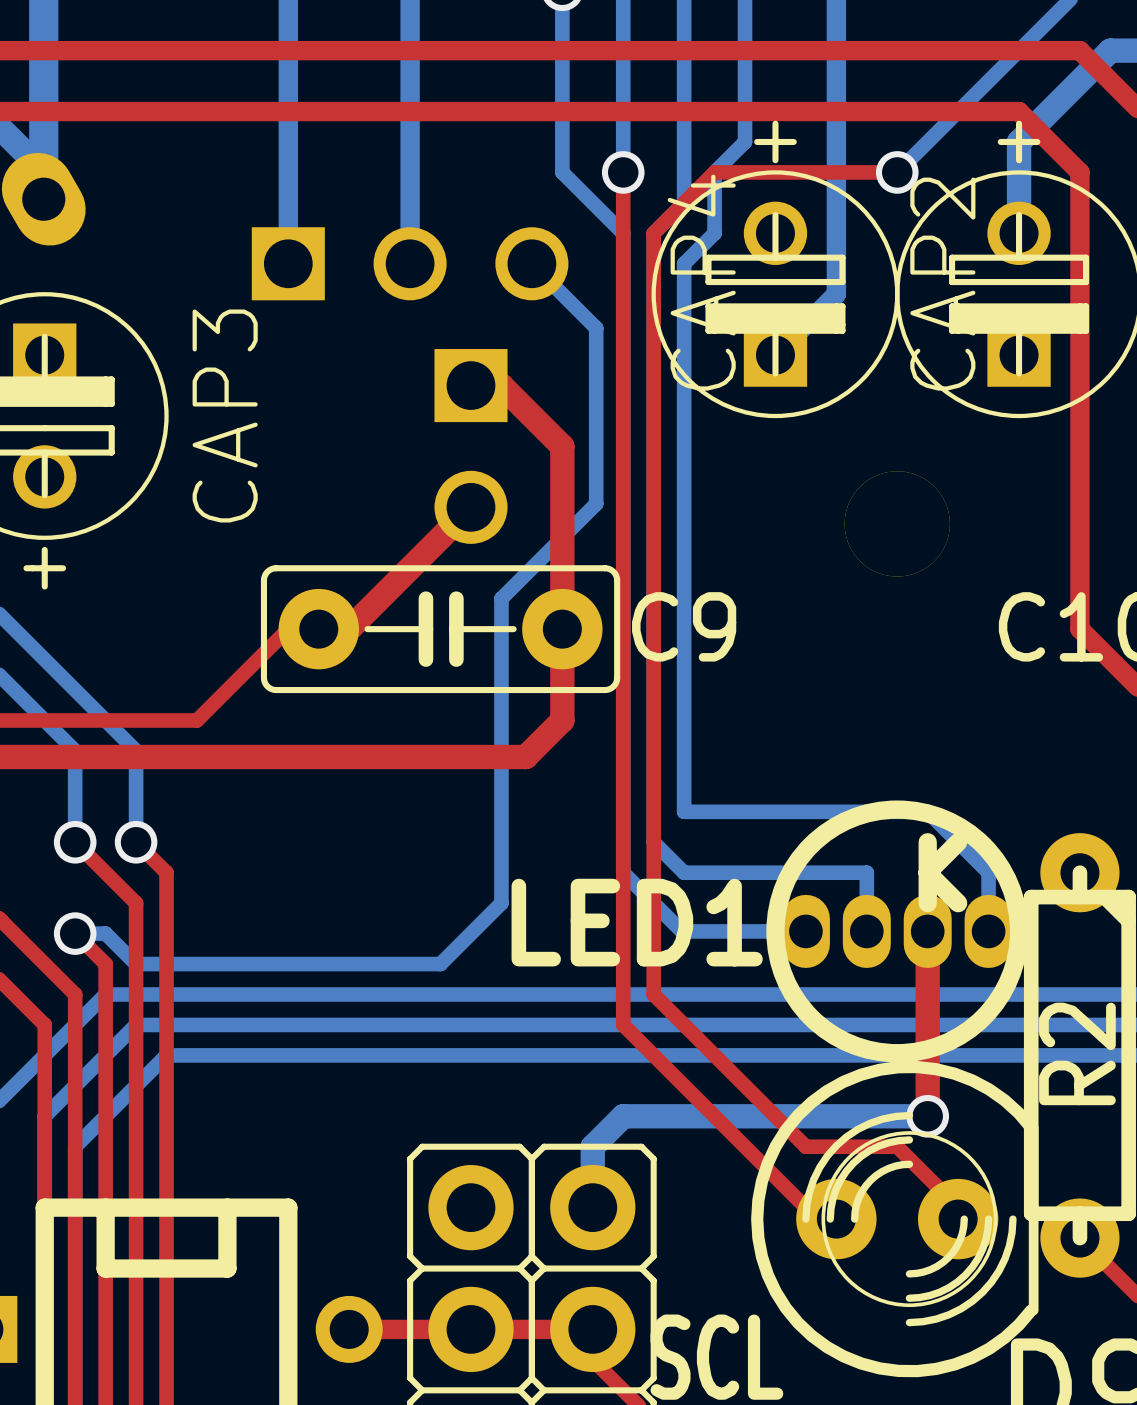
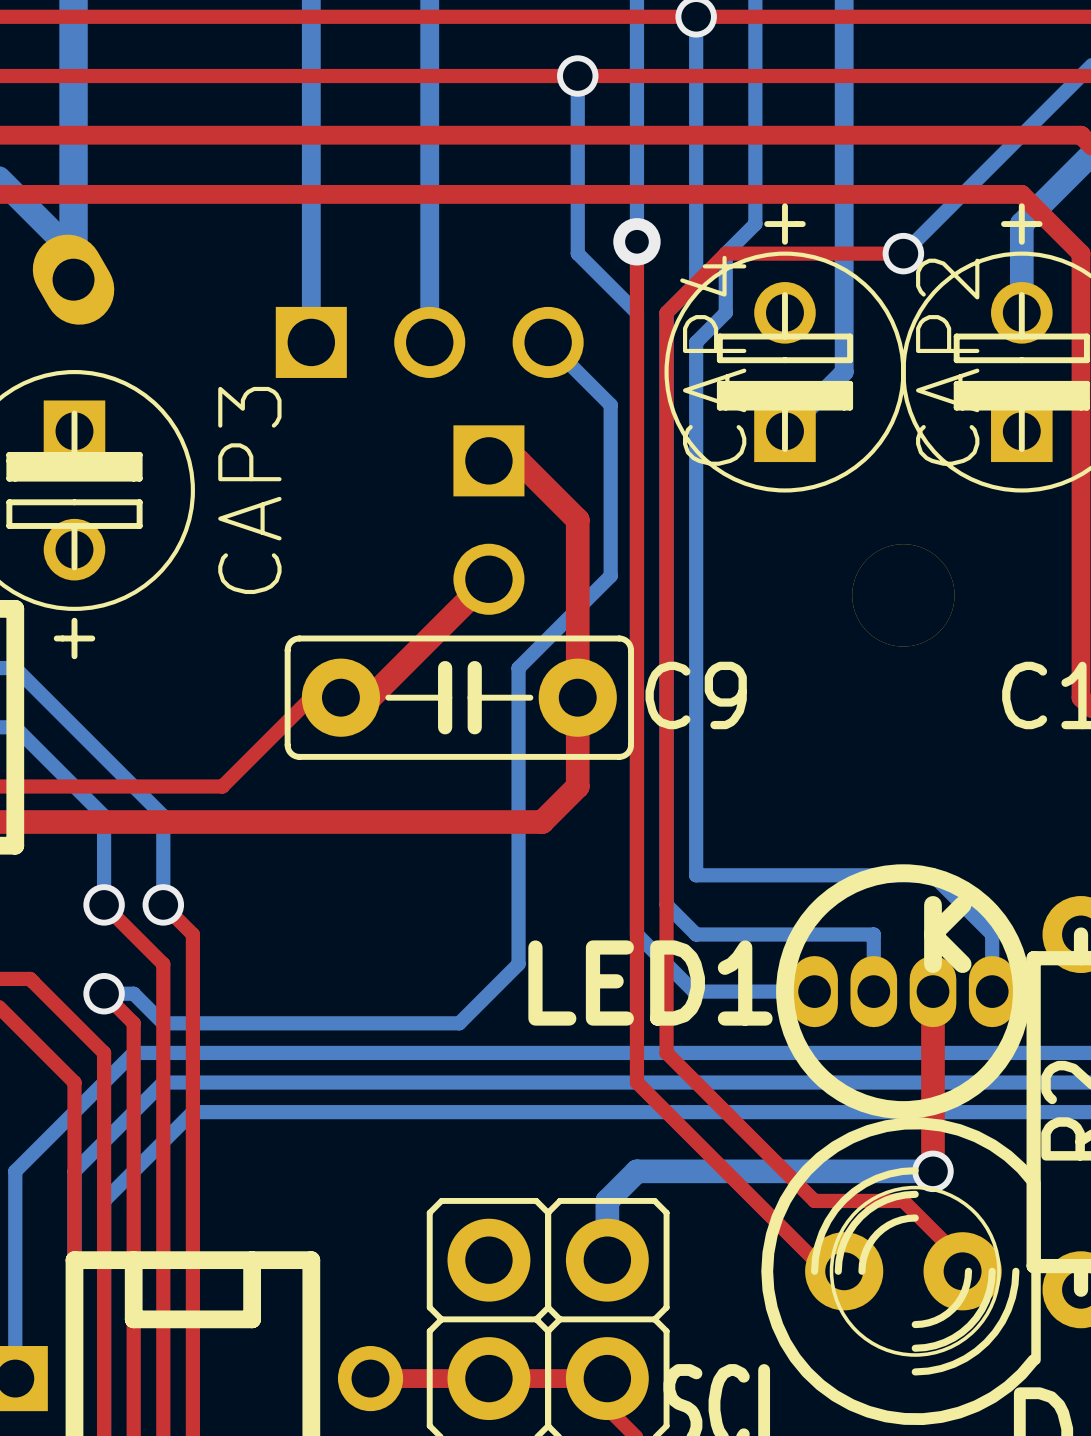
via size: [601, 151, 645, 194] -> [613, 218, 661, 266]

